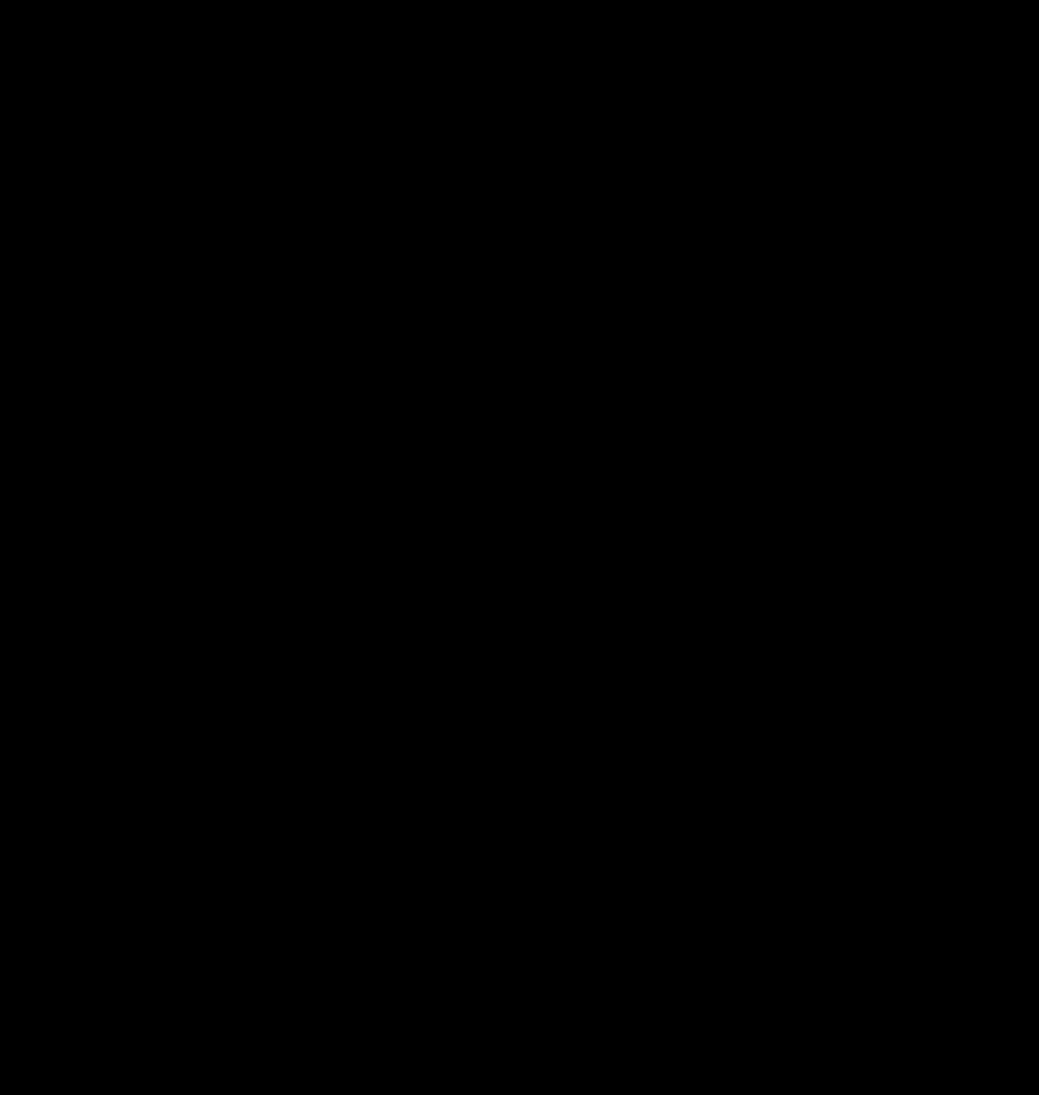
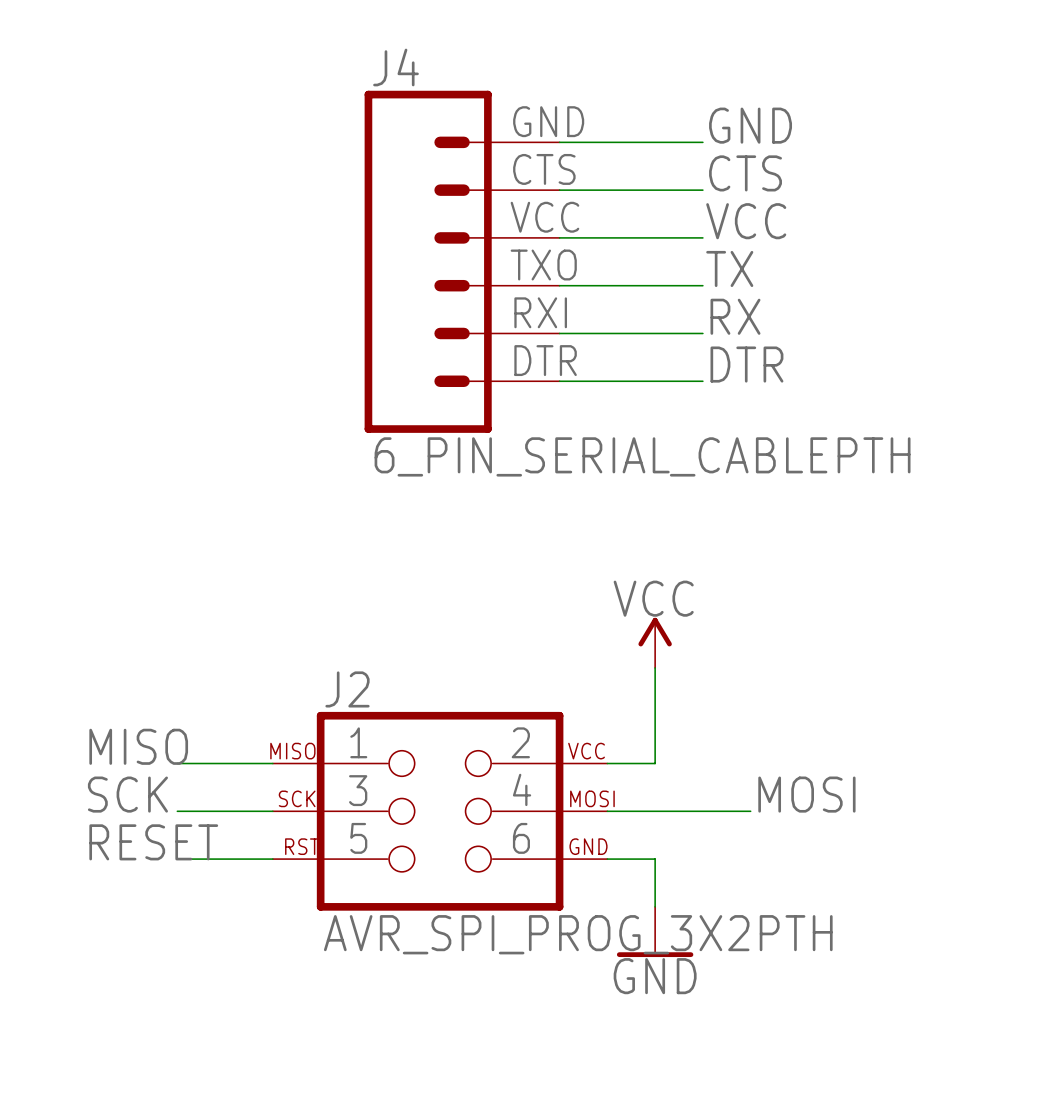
label: none -> GND (750, 125)
wire: none -> (559, 142) (702, 142)
label: none -> CTS (745, 173)
wire: none -> (559, 190) (702, 190)
label: none -> VCC (746, 221)
wire: none -> (559, 237) (702, 237)
J4: none -> 6_PIN_SERIAL_CABLEPTH (462, 261)
label: none -> TX (729, 268)
wire: none -> (559, 285) (702, 285)
label: none -> RX (735, 316)
wire: none -> (559, 333) (702, 333)
label: none -> DTR (746, 364)
wire: none -> (559, 381) (702, 381)
power symbol: none -> VCC (655, 642)
wire: none -> (655, 667) (655, 763) (607, 763)
label: none -> MISO (138, 746)
wire: none -> (177, 763) (272, 763)
label: none -> SCK (127, 794)
label: none -> MOSI (806, 794)
wire: none -> (177, 811) (272, 811)
J2: none -> AVR_SPI_PROG_3X2PTH (440, 811)
wire: none -> (607, 811) (750, 811)
label: none -> RESET (153, 842)
wire: none -> (177, 859) (272, 859)
wire: none -> (607, 859) (655, 859) (655, 906)
power symbol: none -> GND (655, 931)

